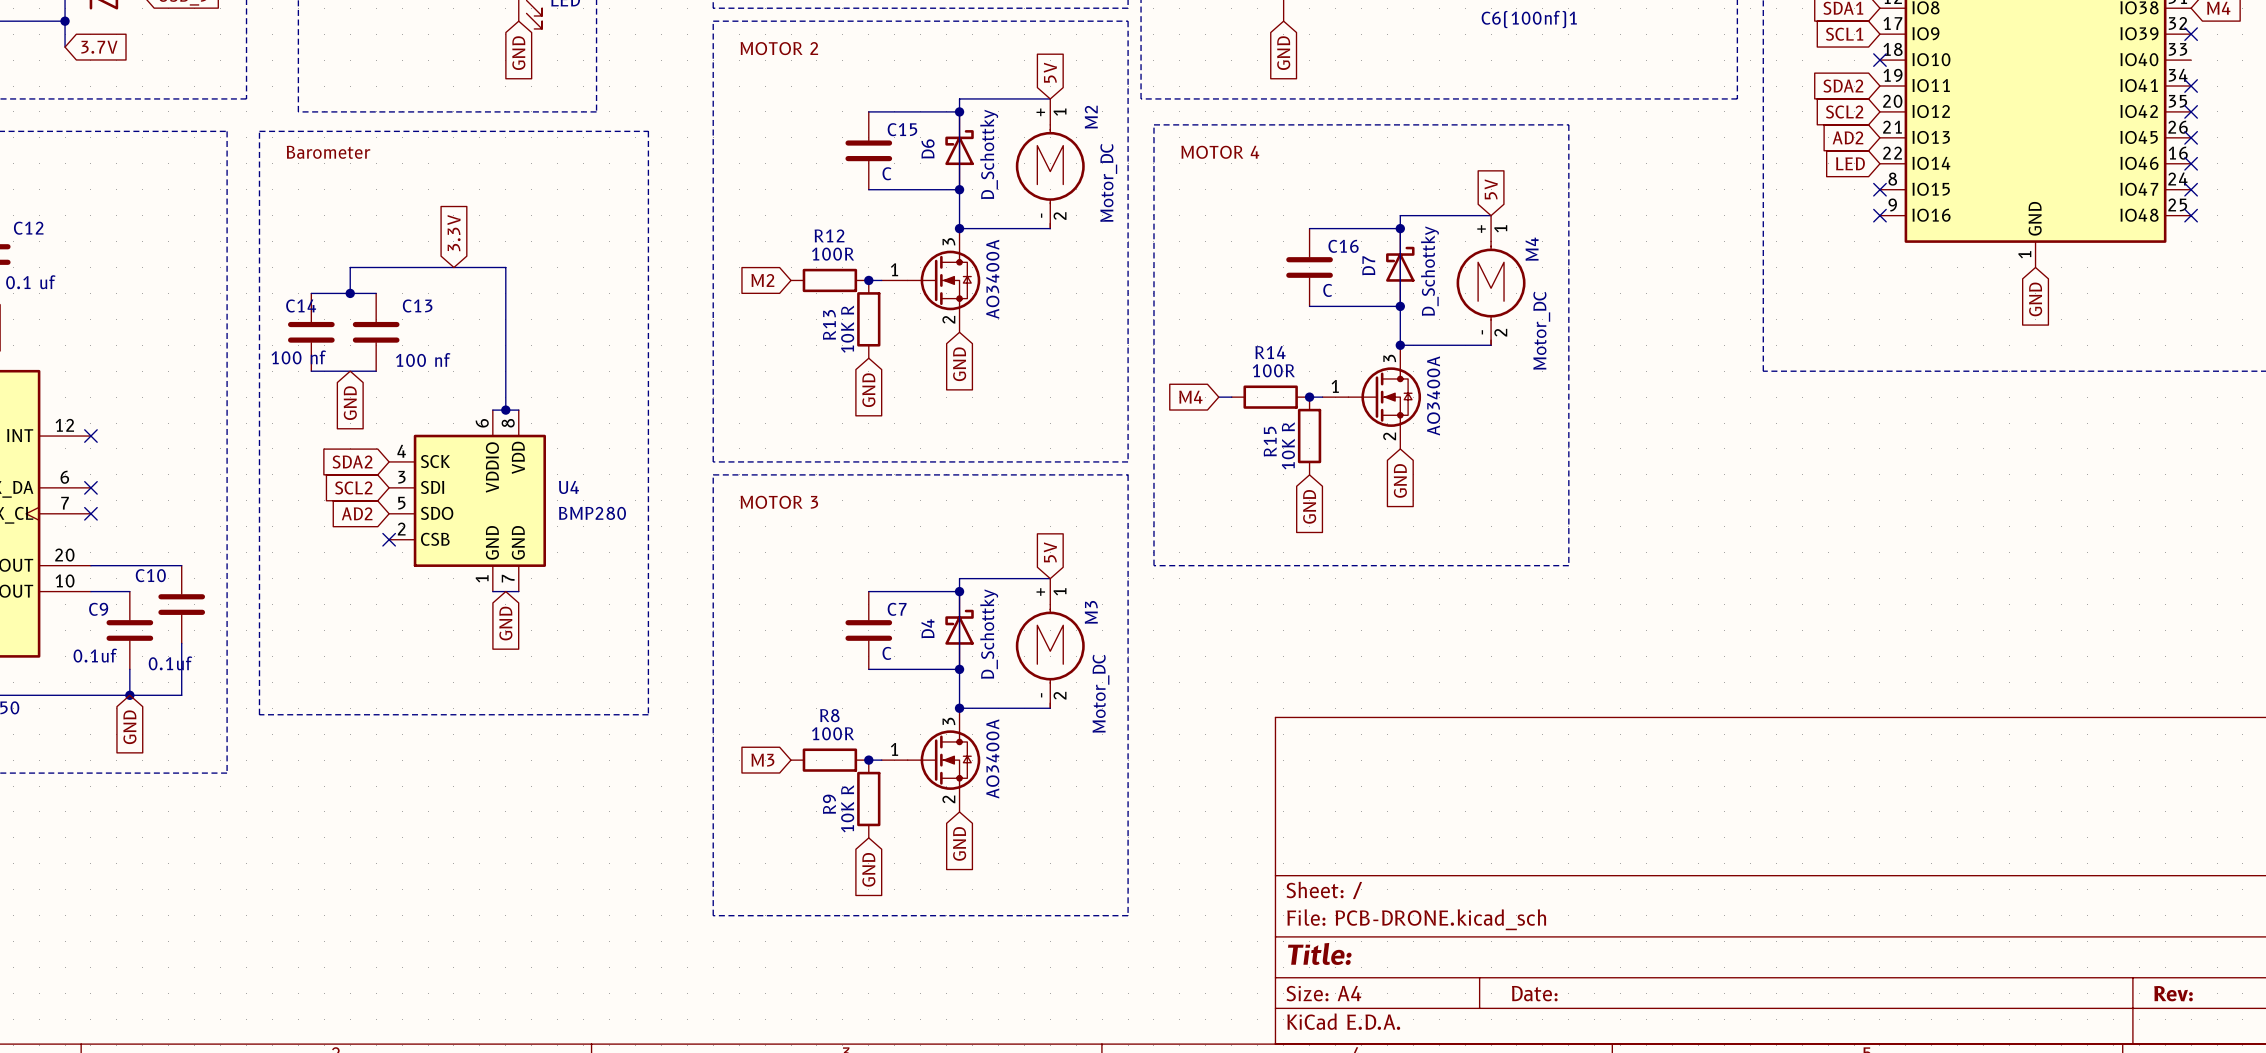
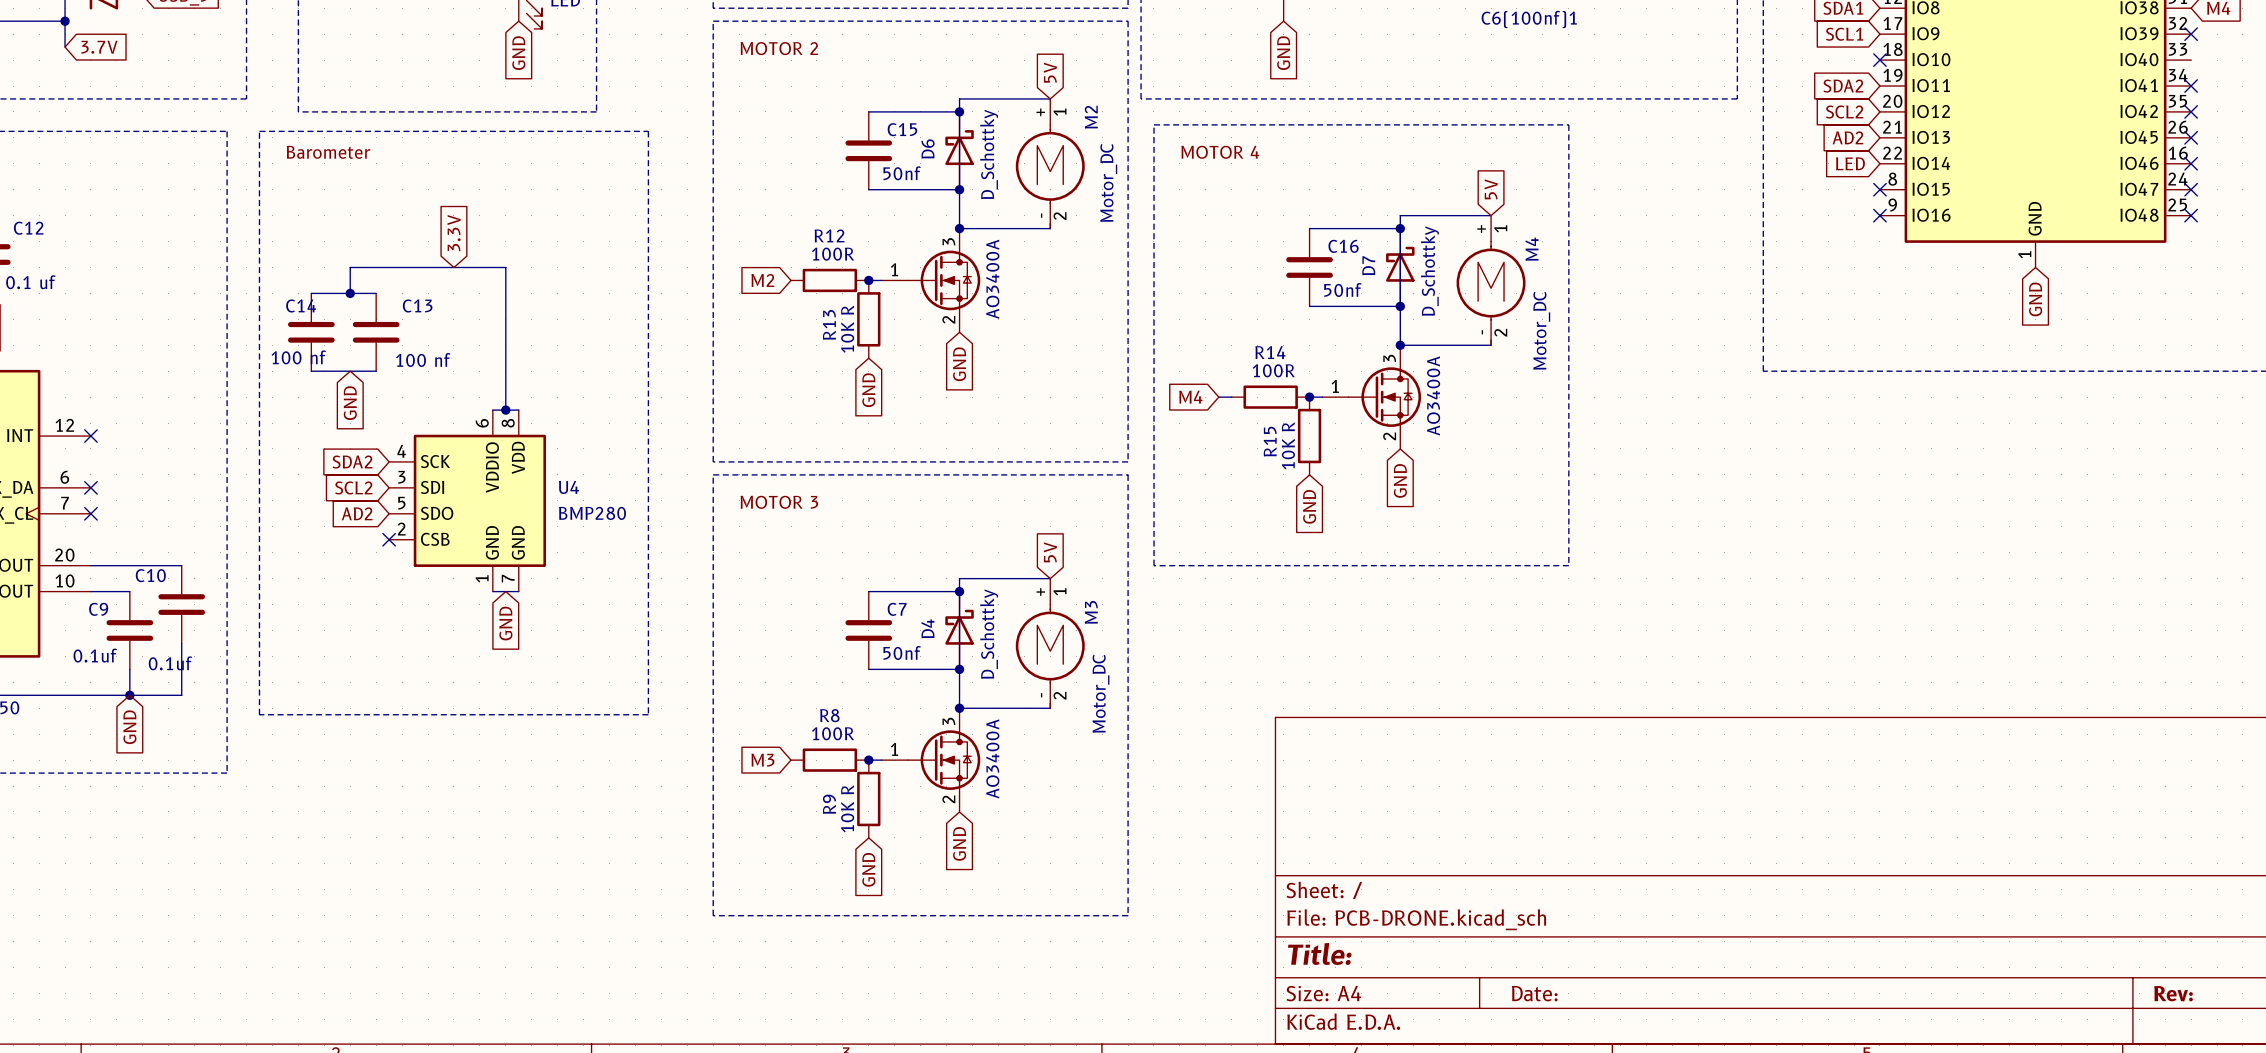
C15 value: C (886, 173) -> 50nf (902, 173)
C16 value: C (1327, 290) -> 50nf (1342, 290)
C7 value: C (886, 653) -> 50nf (902, 652)

